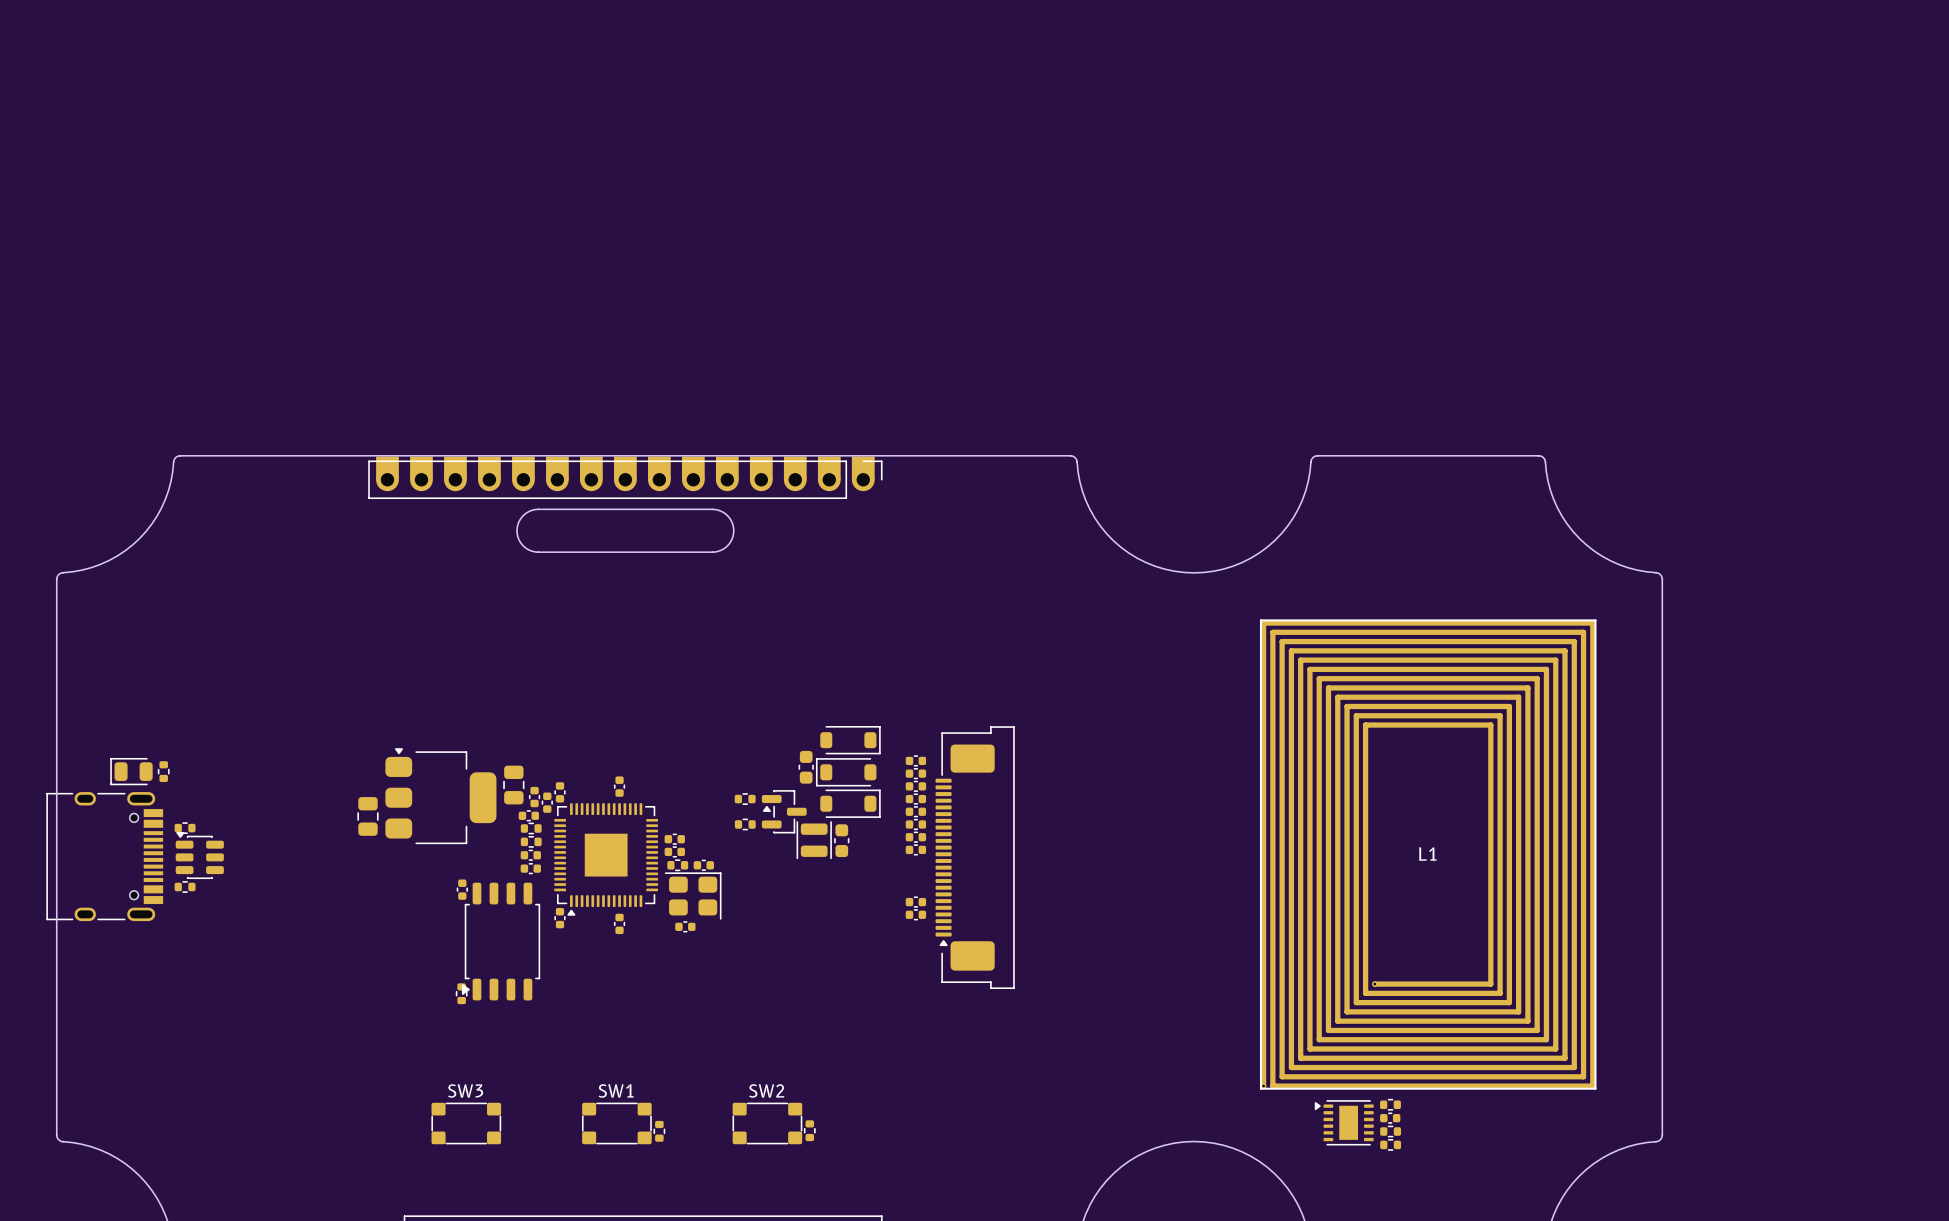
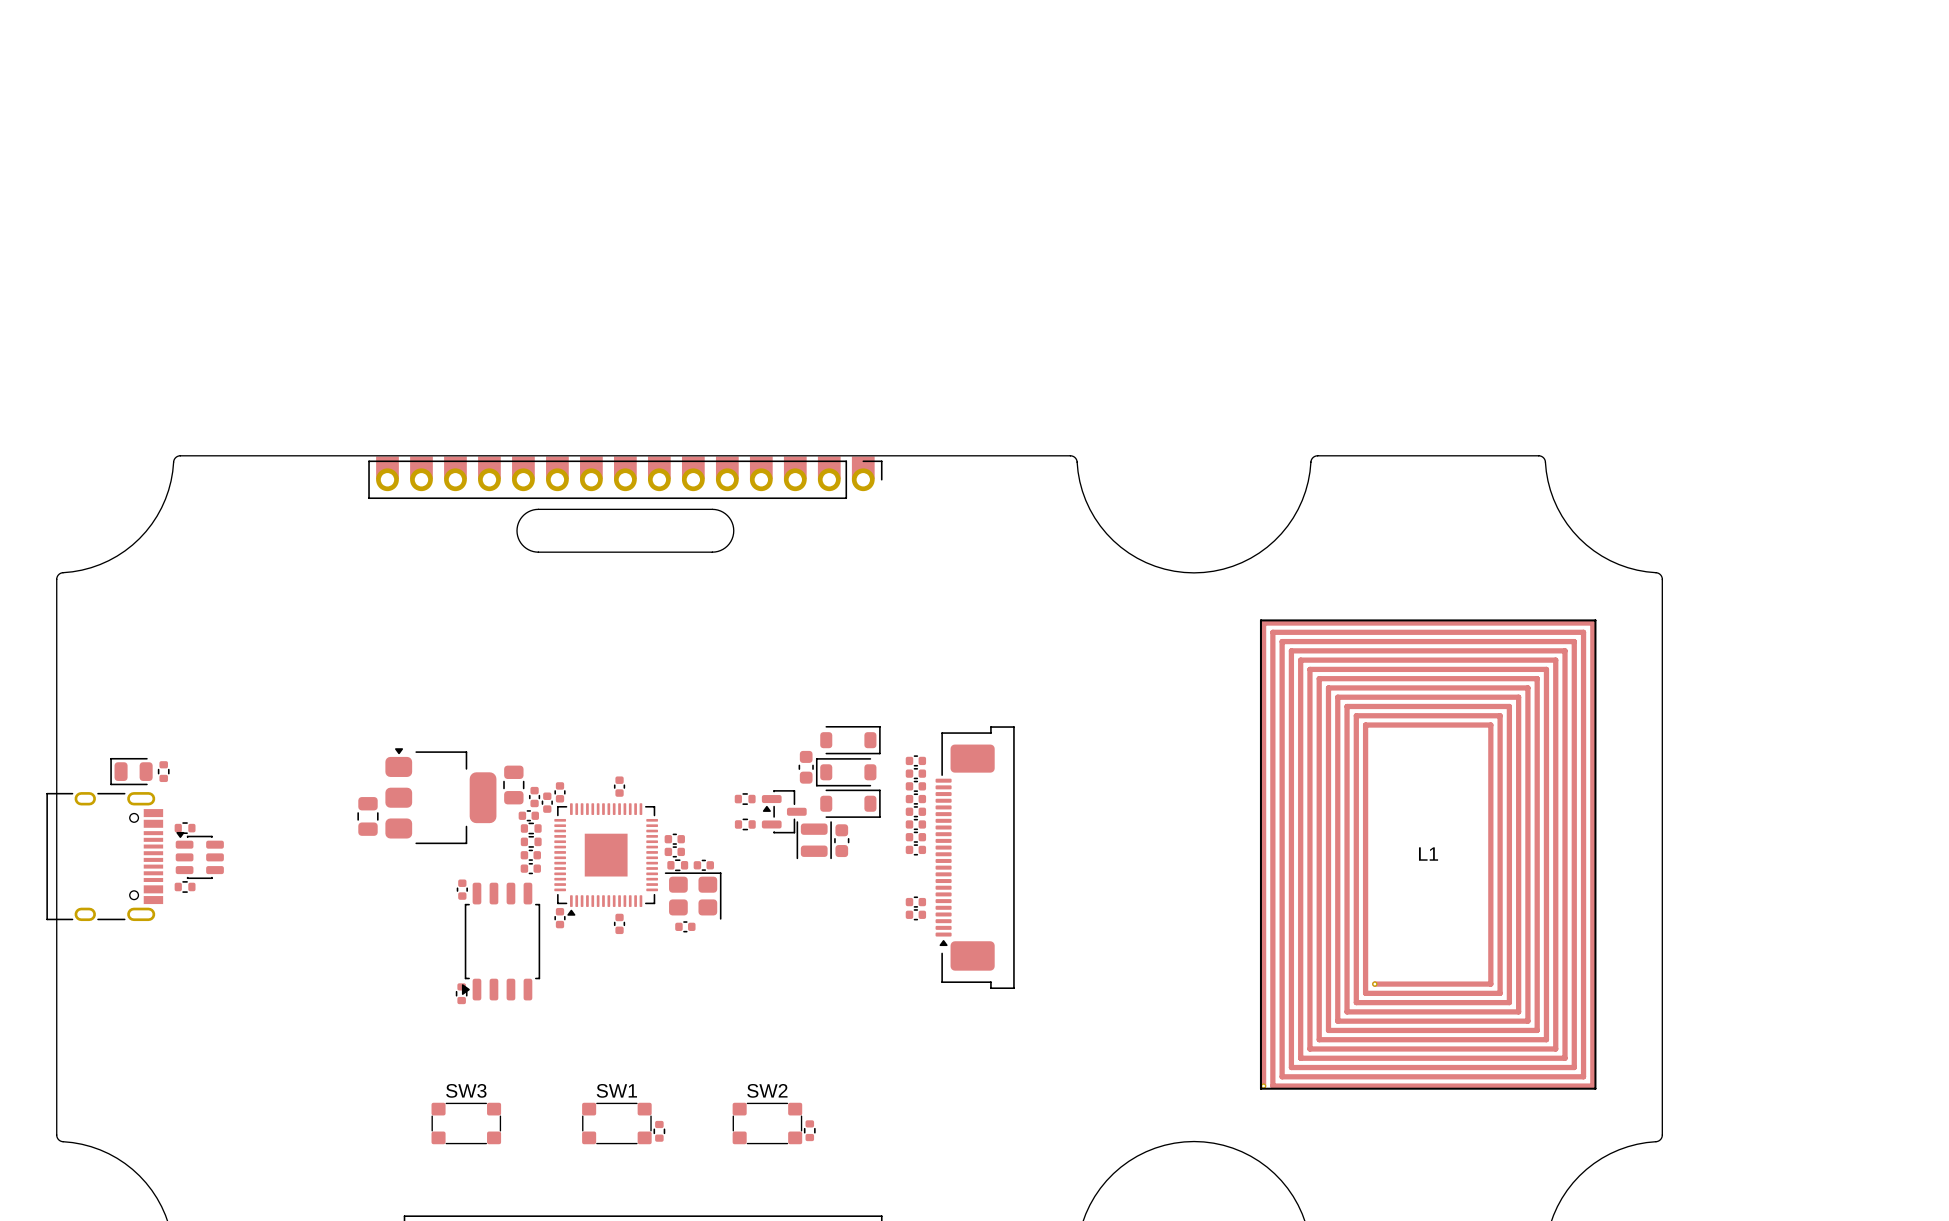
part: (1390, 1104) -> none
part: (1390, 1118) -> none
part: (1344, 1122) -> none
part: (1390, 1131) -> none
part: (1390, 1144) -> none

